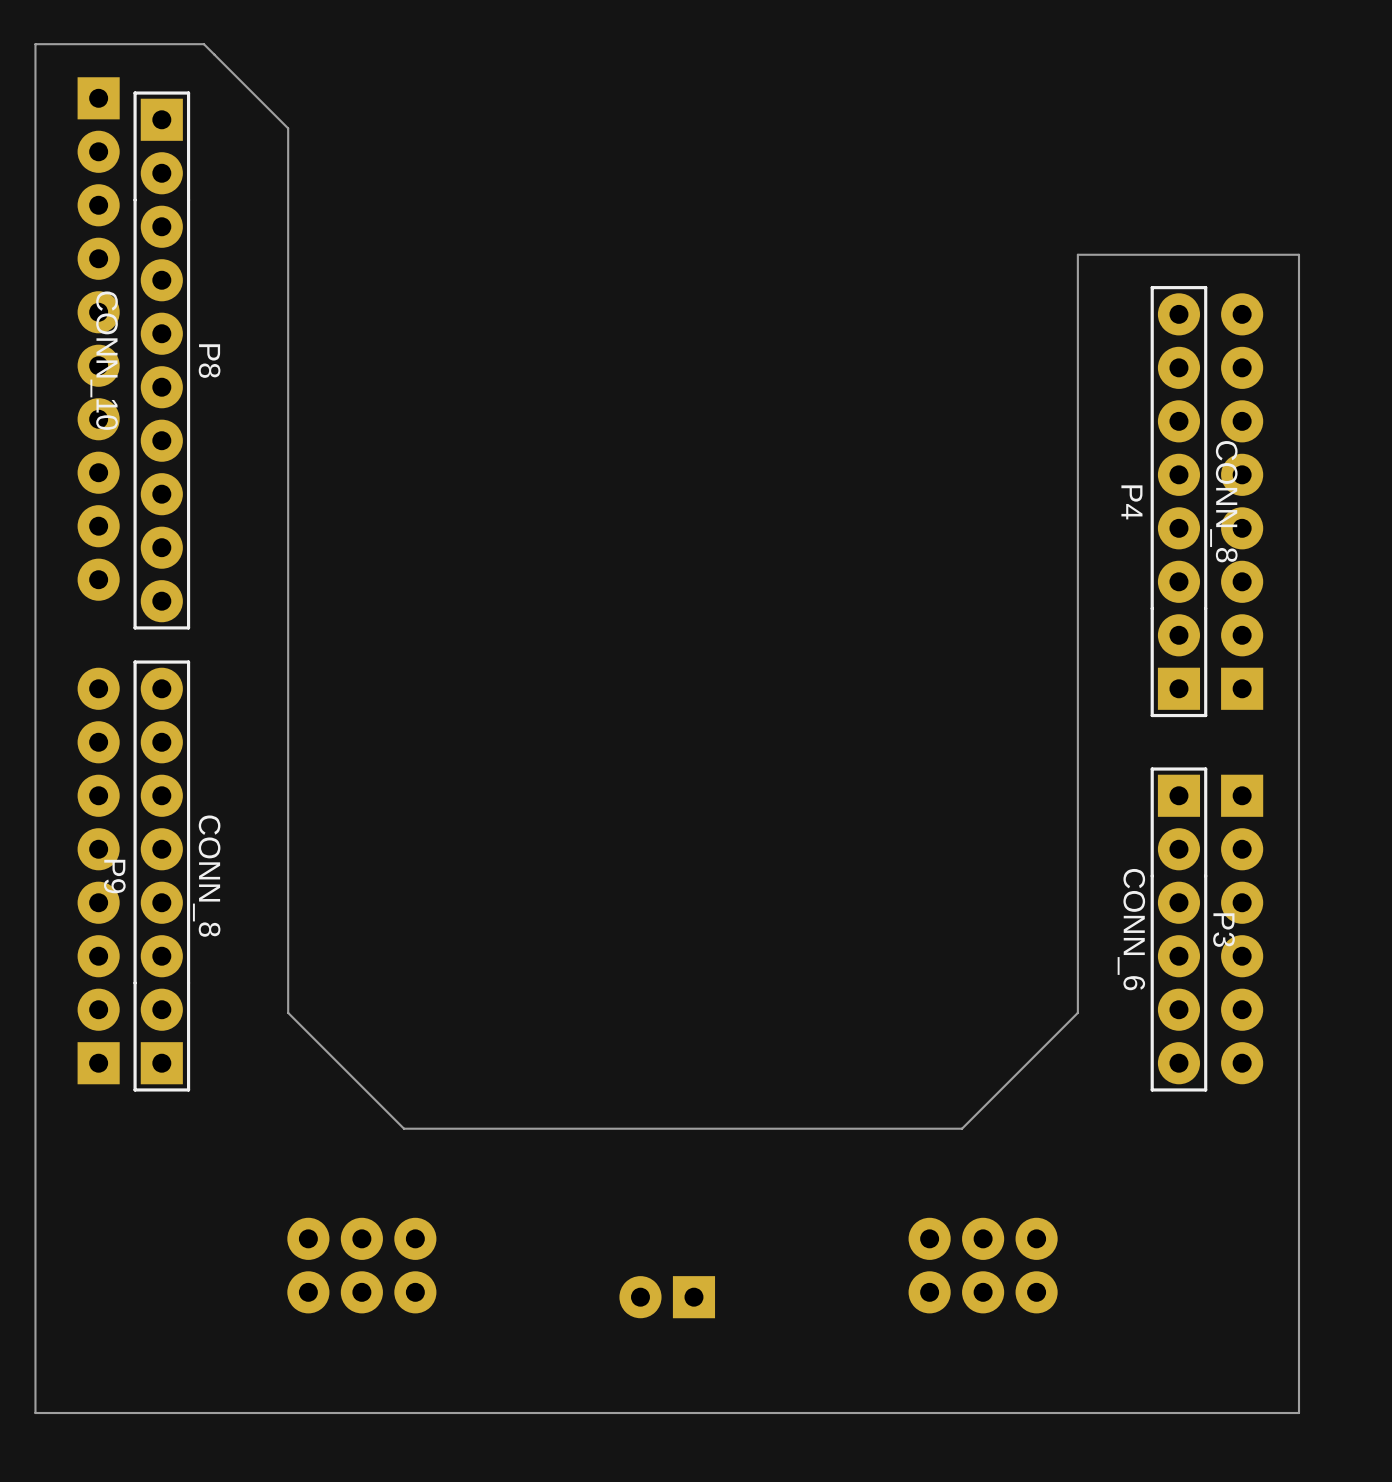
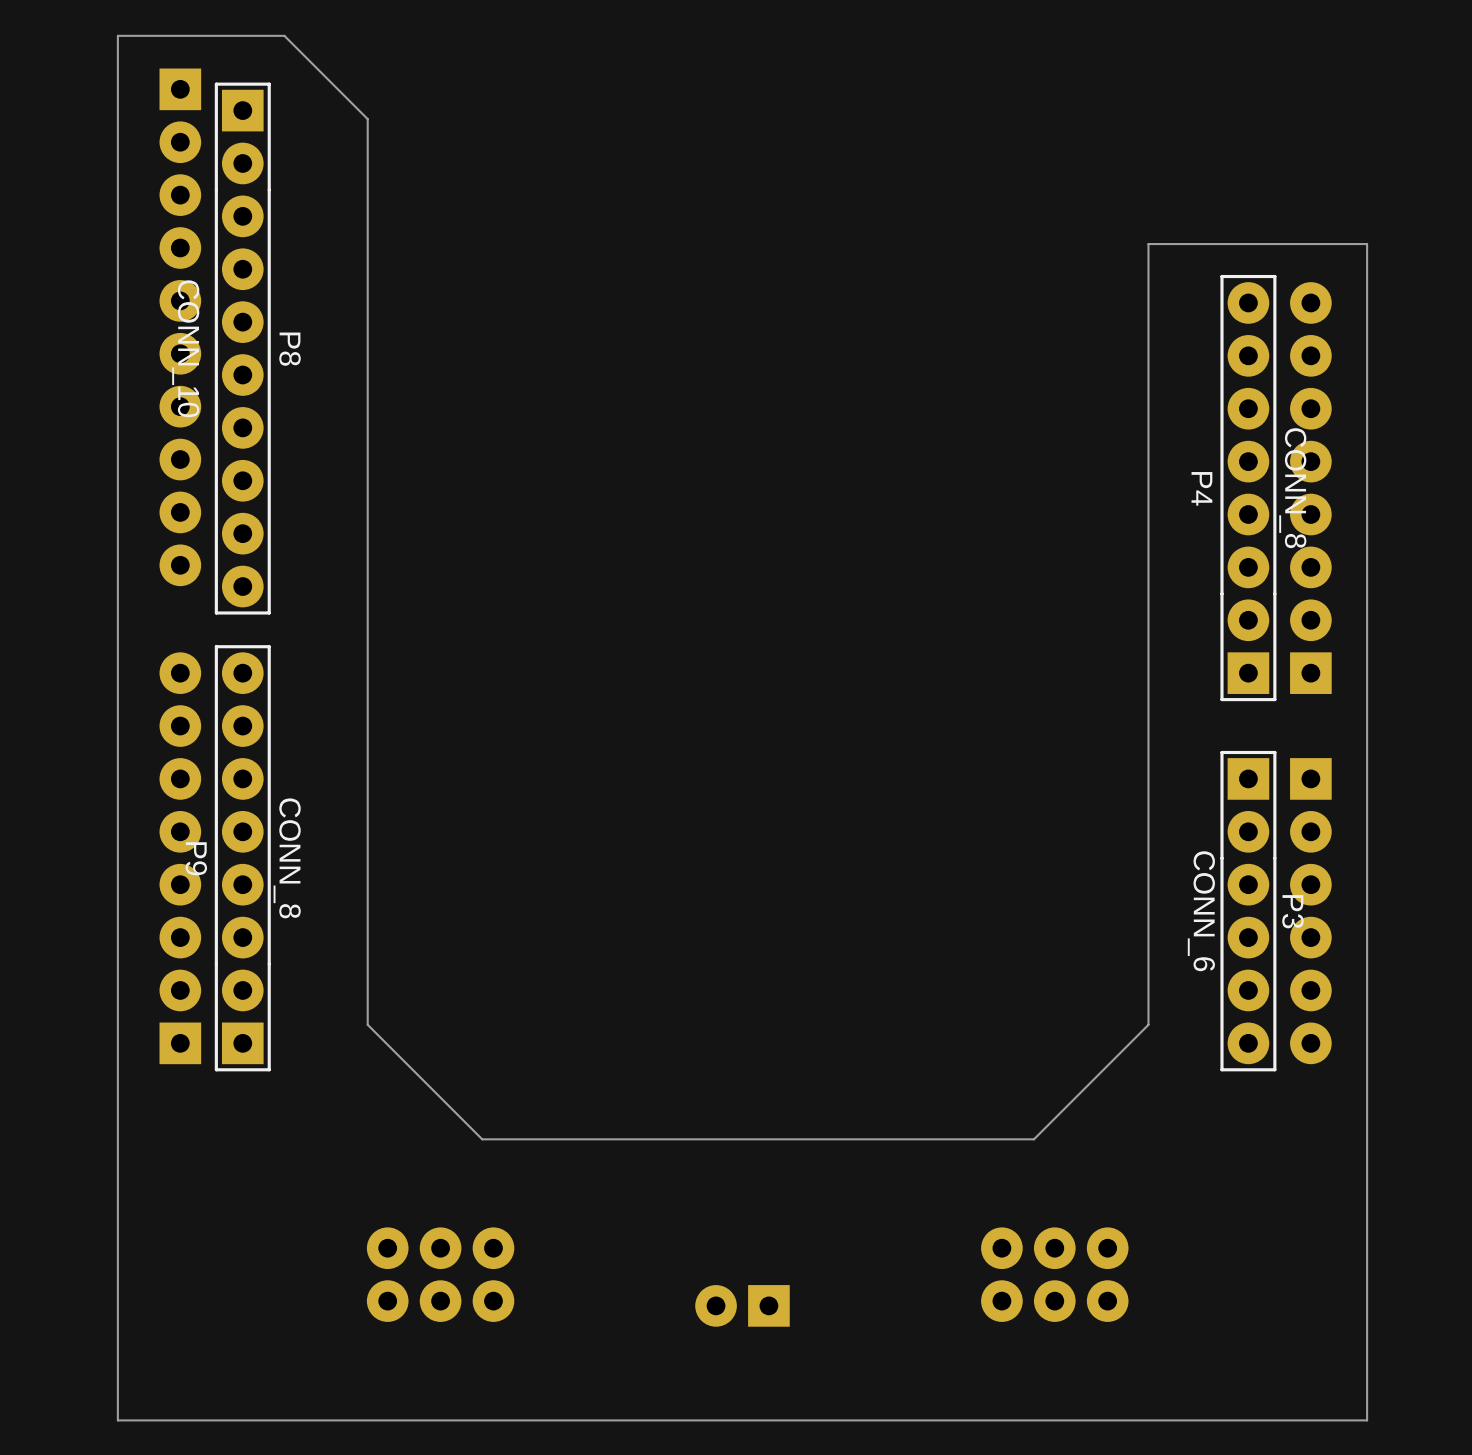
board edge: (1077, 1012) (962, 1128) (403, 1128) (288, 1012) -> (1148, 993) (1148, 1024) (1033, 1139) (482, 1139) (367, 1024) (367, 993)
part position: (361, 1265) -> (440, 1274)
part position: (983, 1265) -> (1054, 1274)
part position: (667, 1297) -> (742, 1305)
board edge: (1299, 1413) (35, 1413) -> (1367, 1389) (1367, 1420) (117, 1420) (117, 1389)

